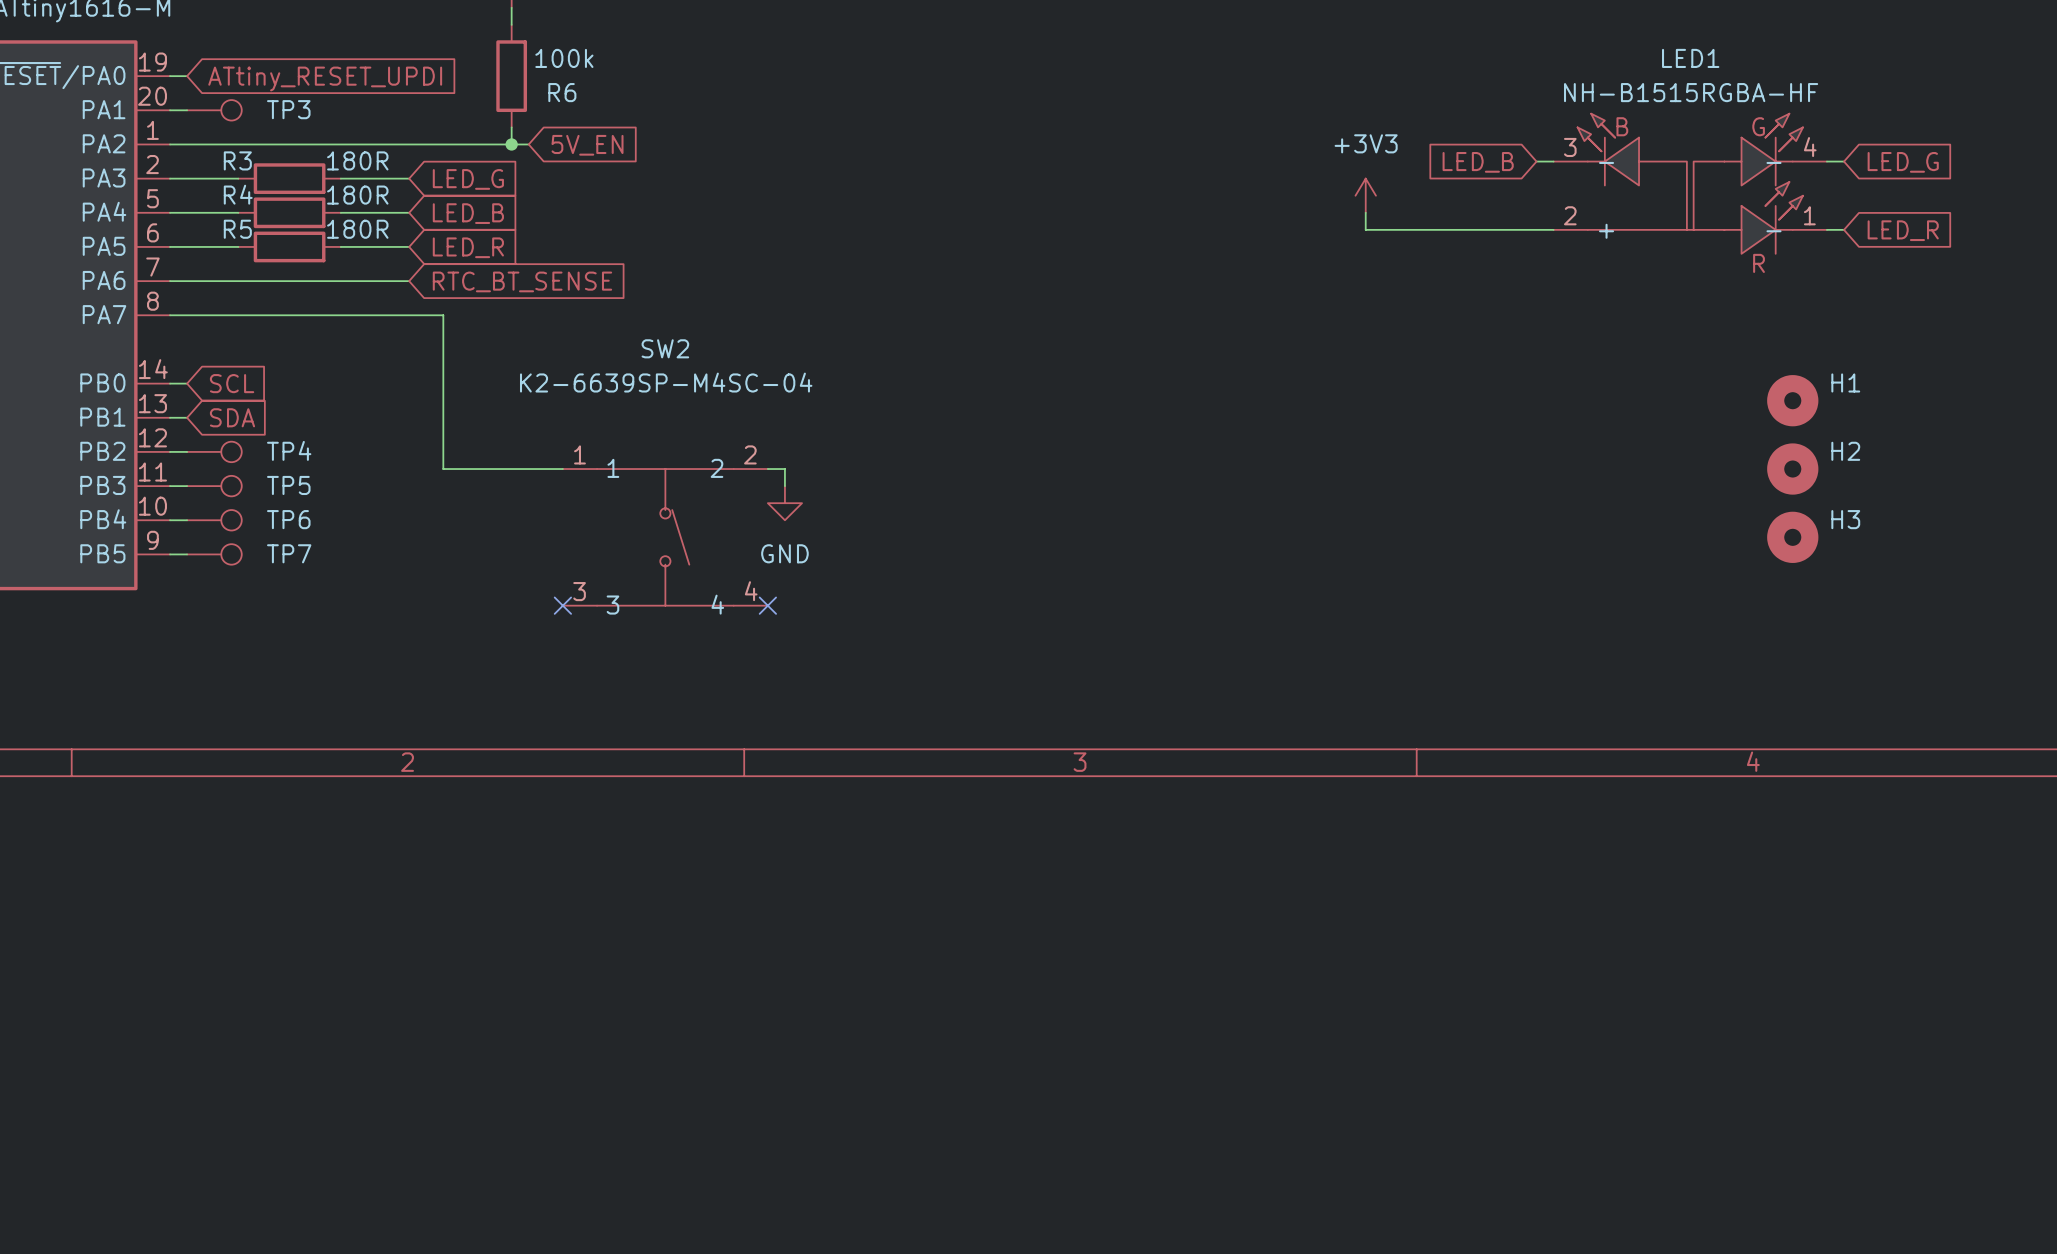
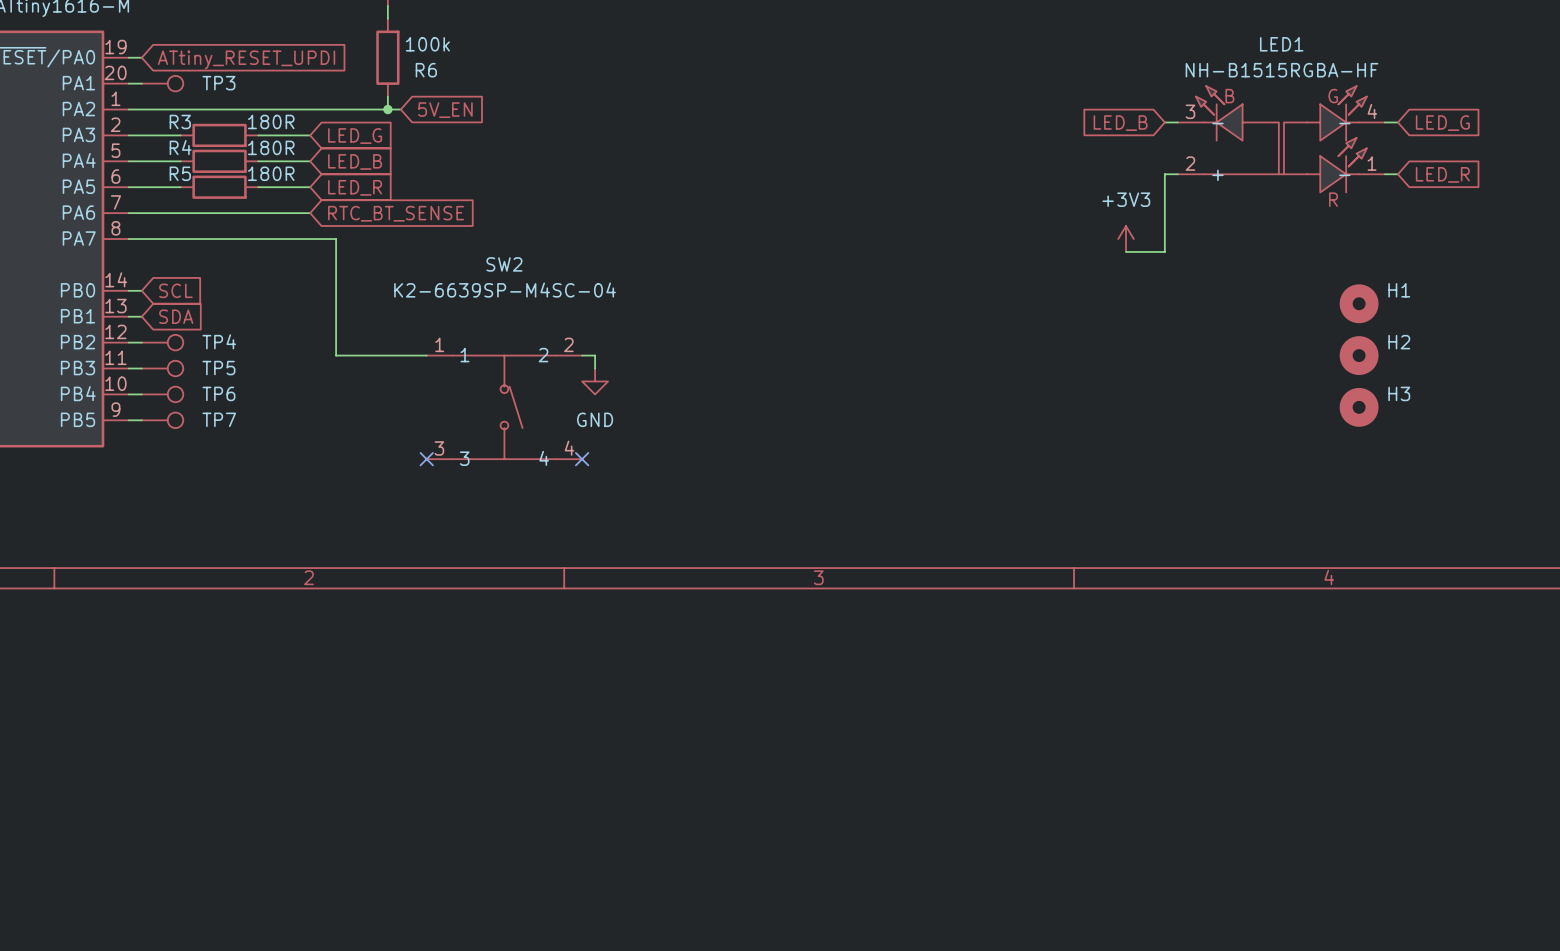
power symbol position: +3V3 (1365, 195) -> +3V3 (1126, 239)
wire: (1365, 212) (1365, 229) (1536, 229) -> (1126, 251) (1164, 251) (1164, 174)

